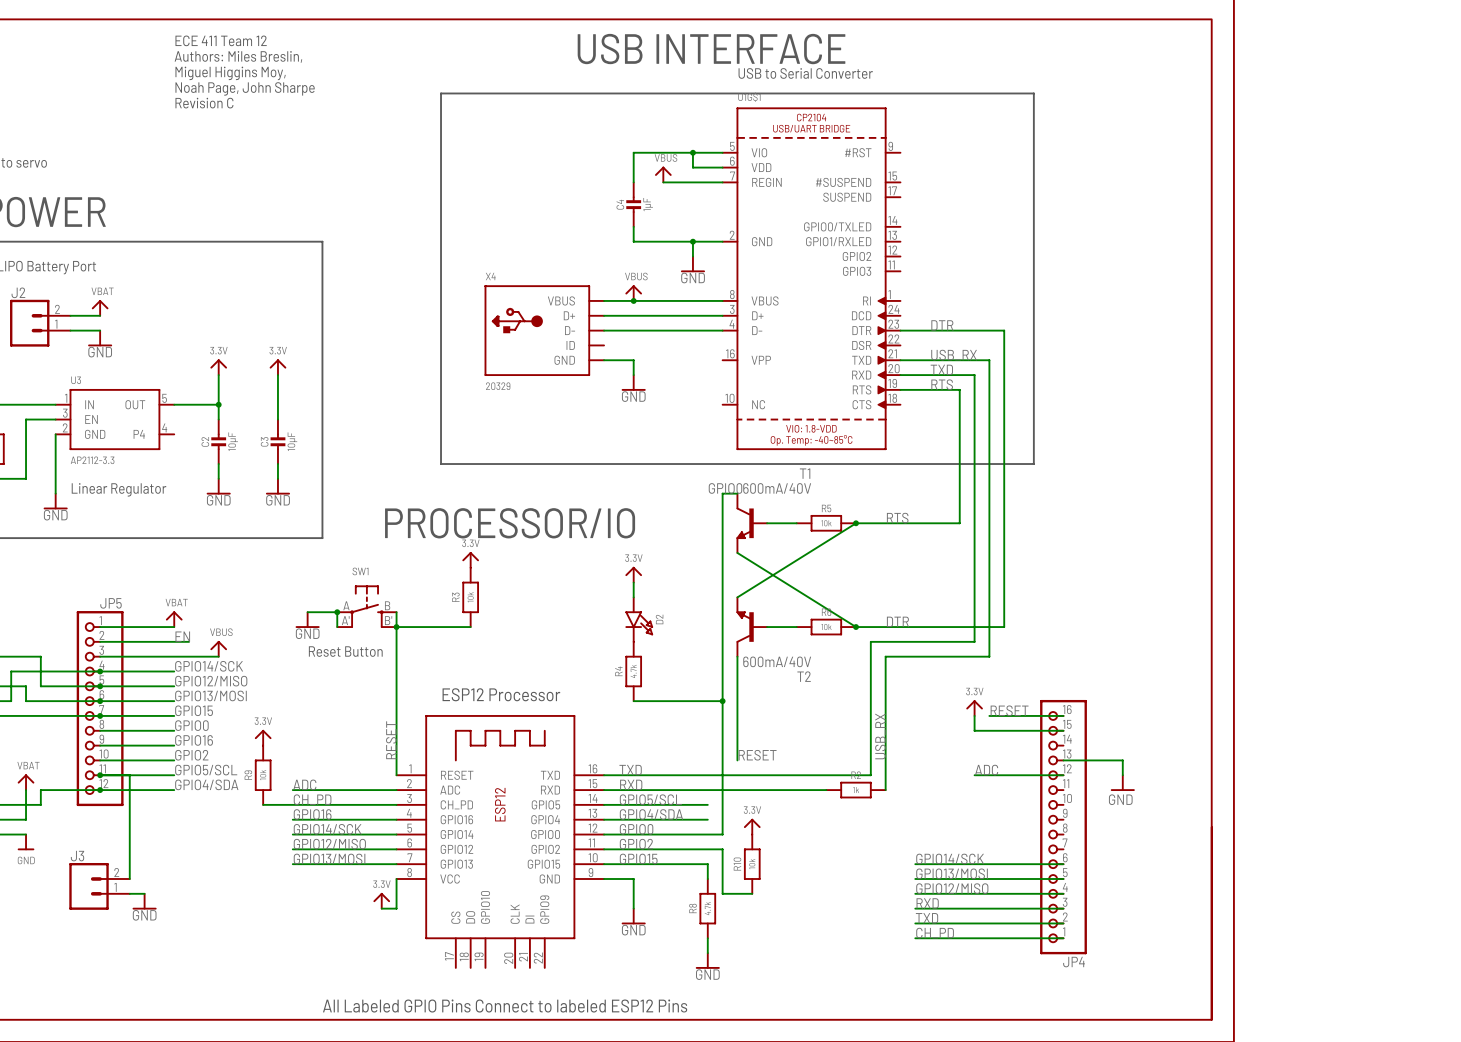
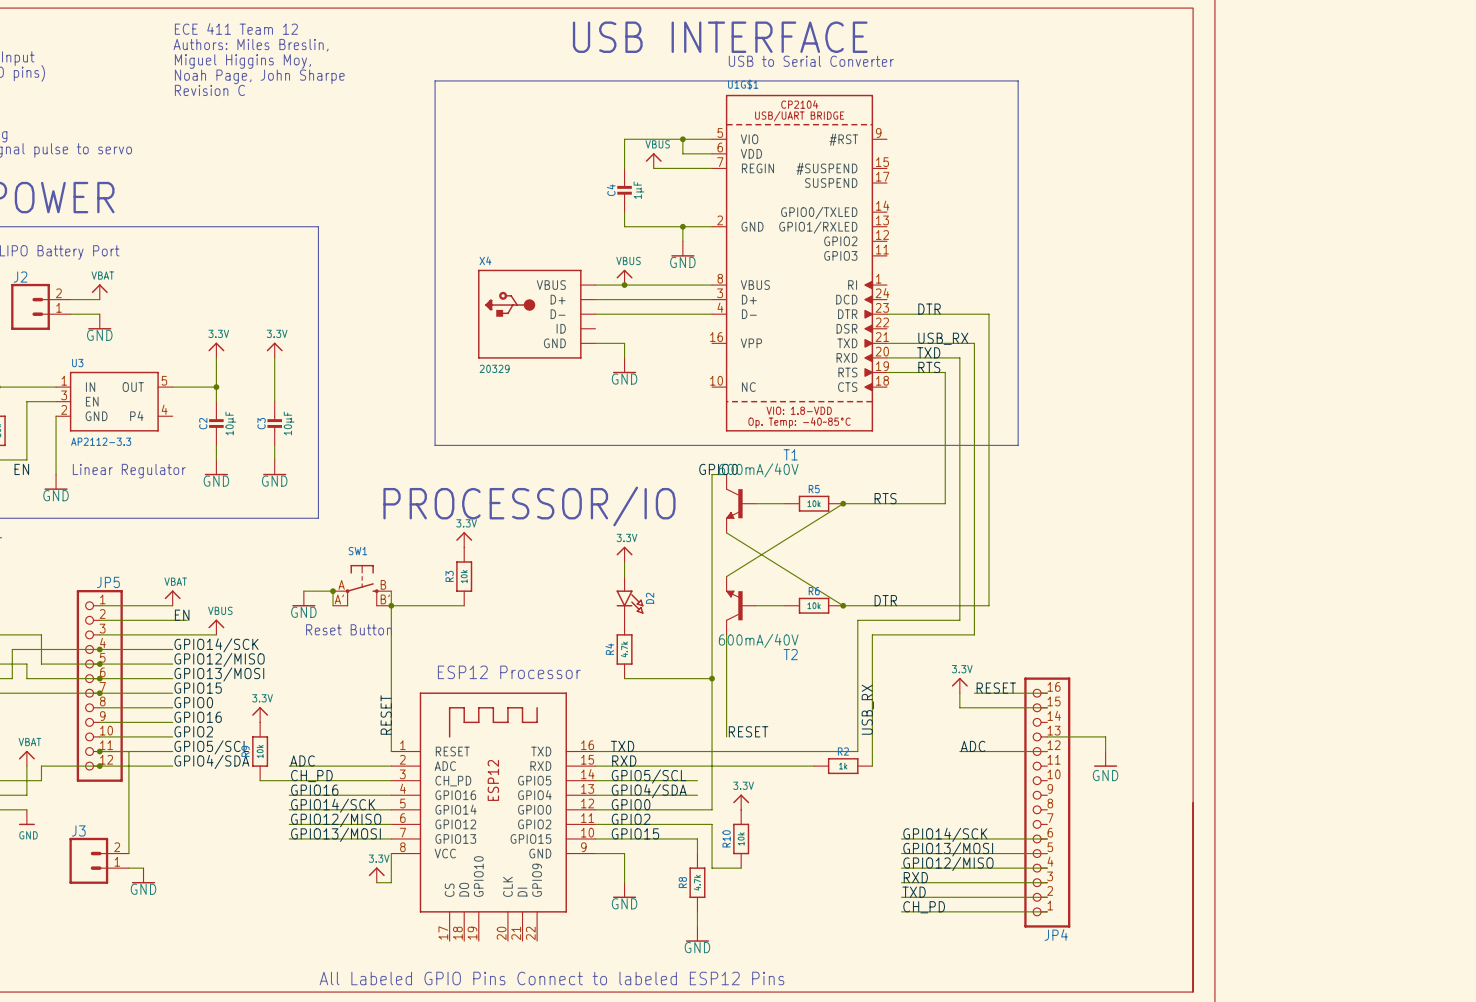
label: none -> EN (21, 469)

